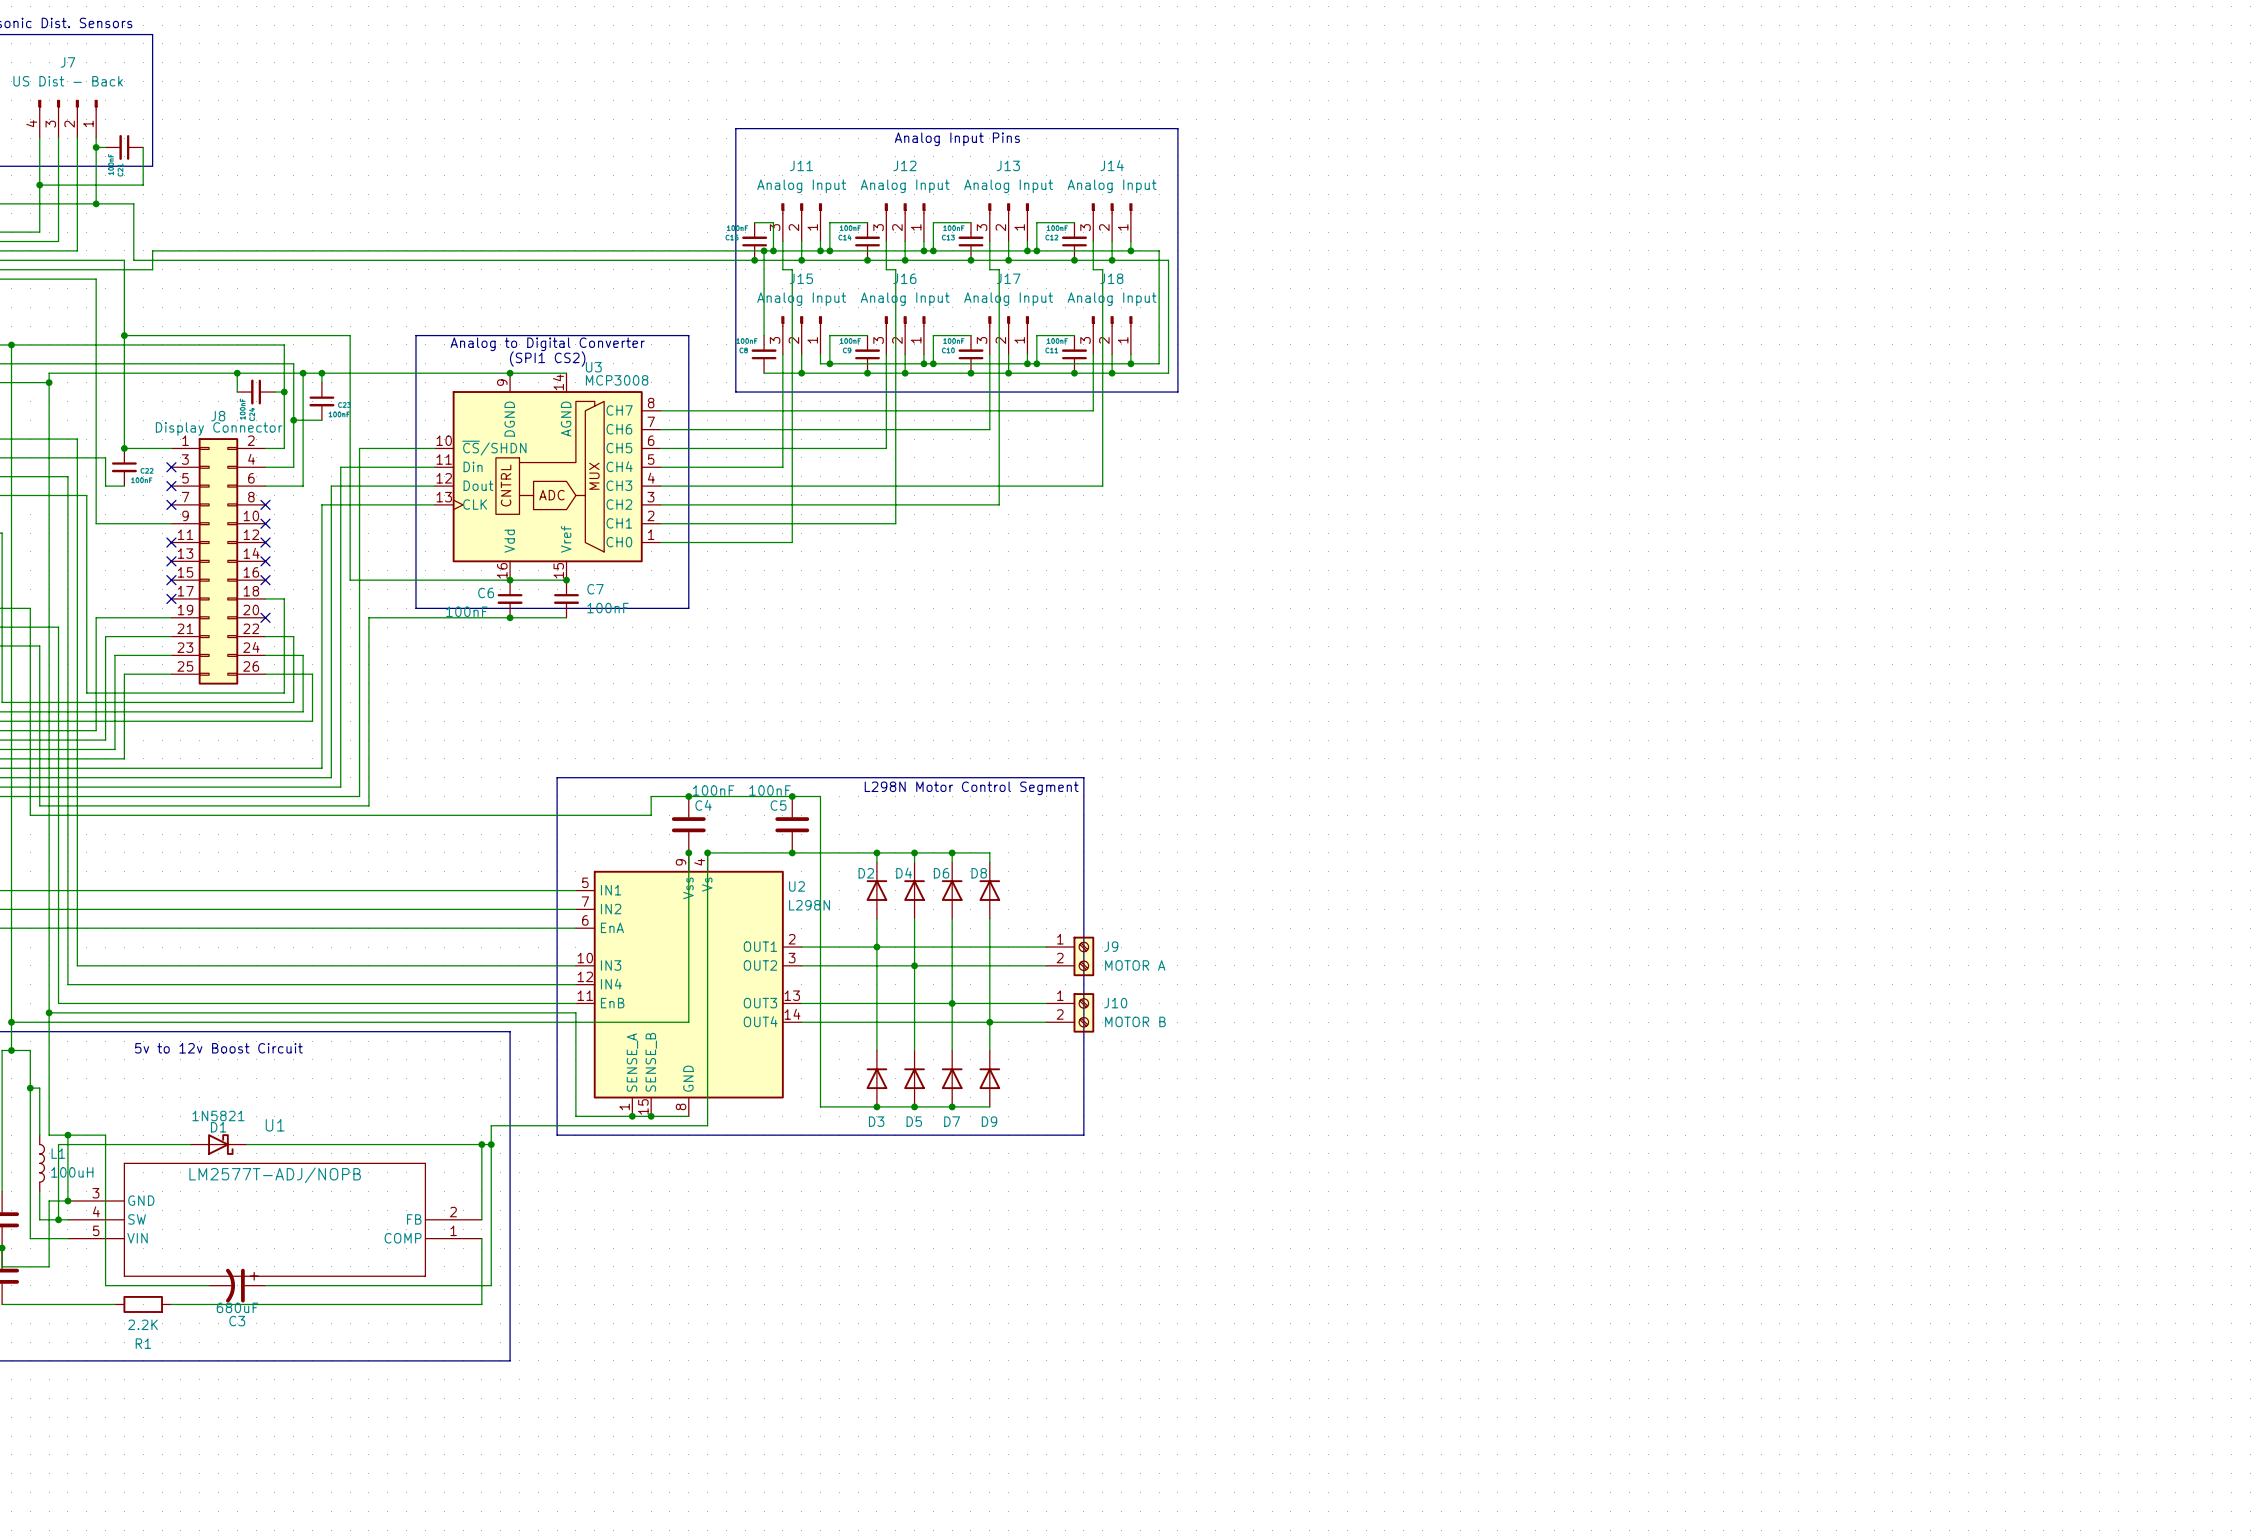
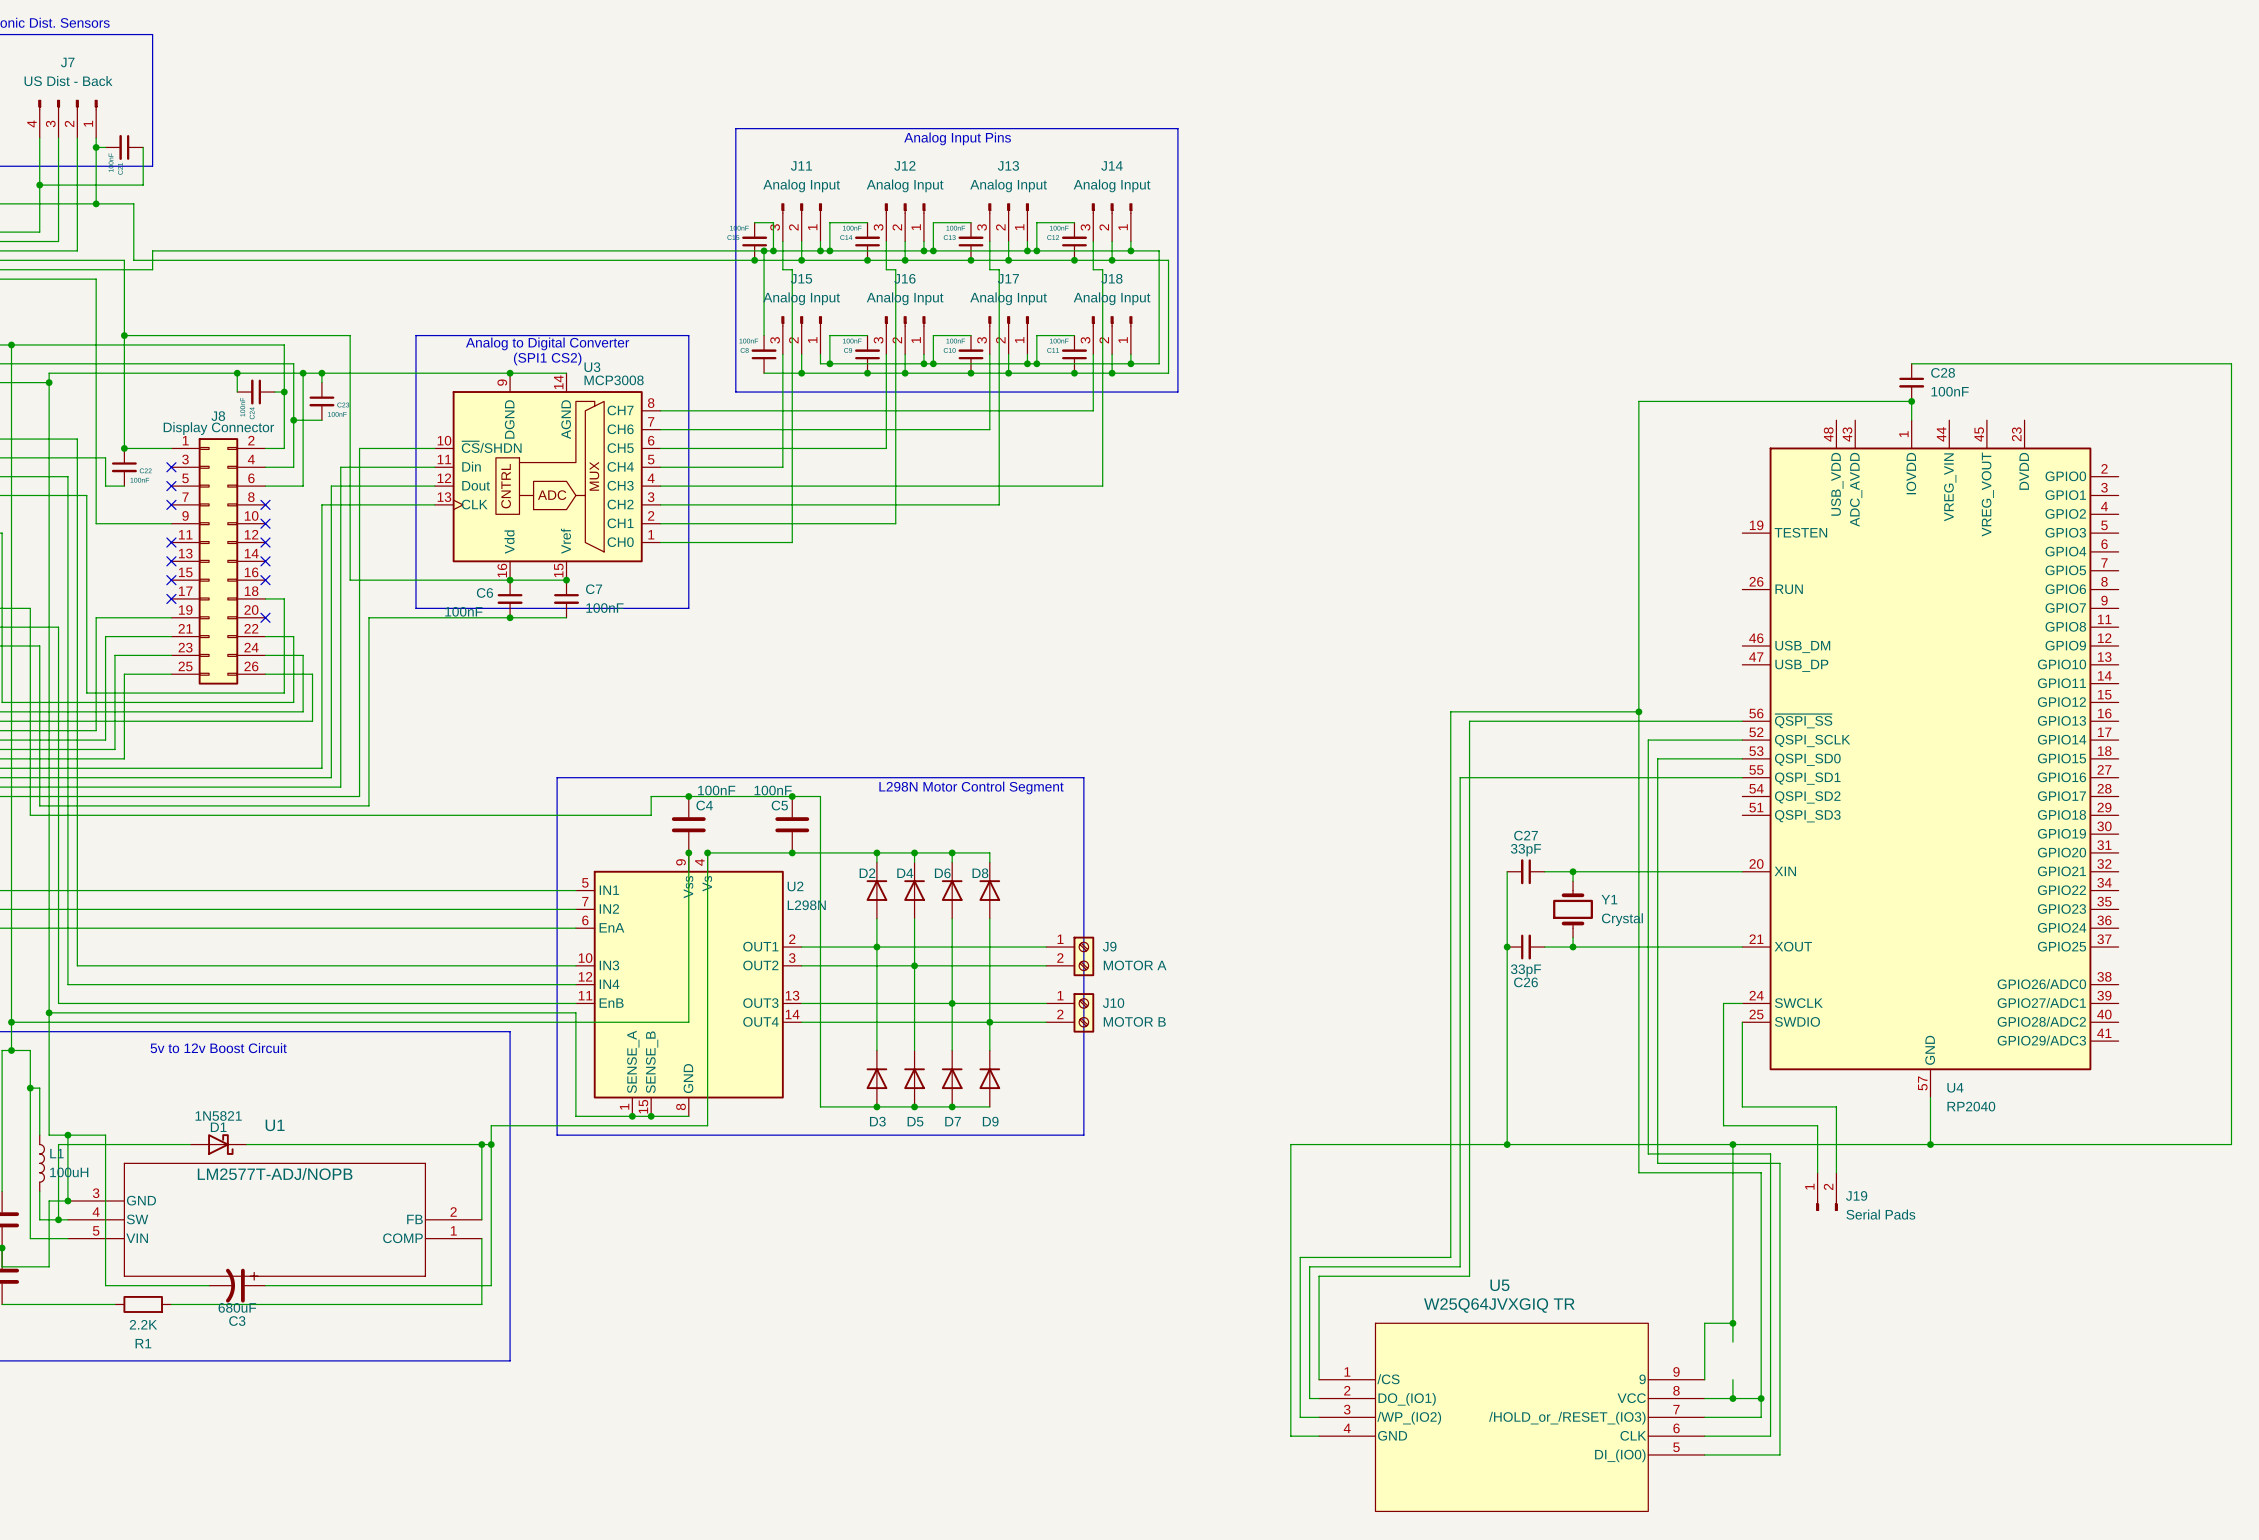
wire: none -> (1911, 363) (2231, 363) (2231, 1144) (1290, 1144) (1290, 1436) (1319, 1436)
C28: none -> 100nF (1911, 382)
junction: none -> (1911, 401)
wire: none -> (1911, 420) (1911, 401) (1638, 401) (1638, 1172) (1761, 1172) (1761, 1417) (1704, 1417)
wire: none -> (1638, 711) (1450, 711) (1450, 1257) (1300, 1257) (1300, 1417) (1319, 1417)
junction: none -> (1638, 711)
wire: none -> (1742, 721) (1469, 721) (1469, 1276) (1319, 1276) (1319, 1379)
wire: none -> (1742, 740) (1648, 740) (1648, 1153) (1770, 1153) (1770, 1436) (1704, 1436)
wire: none -> (1742, 758) (1657, 758) (1657, 1163) (1779, 1163) (1779, 1454) (1704, 1454)
U4: none -> RP2040 (1930, 758)
wire: none -> (1742, 777) (1460, 777) (1460, 1266) (1309, 1266) (1309, 1398) (1319, 1398)
wire: none -> (1507, 871) (1507, 1144)
C27: none -> 33pF (1525, 871)
wire: none -> (1544, 871) (1742, 871)
wire: none -> (1573, 871) (1573, 881)
junction: none -> (1573, 871)
Y1: none -> Crystal (1573, 909)
wire: none -> (1573, 937) (1573, 947)
junction: none -> (1507, 947)
C26: none -> 33pF (1525, 947)
wire: none -> (1544, 947) (1742, 947)
junction: none -> (1573, 947)
wire: none -> (1742, 1003) (1723, 1003) (1723, 1125) (1817, 1125) (1817, 1172)
wire: none -> (1742, 1022) (1742, 1106) (1836, 1106) (1836, 1172)
wire: none -> (1930, 1097) (1930, 1144)
junction: none -> (1507, 1144)
wire: none -> (1732, 1144) (1732, 1342)
junction: none -> (1732, 1144)
junction: none -> (1930, 1144)
J19: none -> Serial Pads (1827, 1191)
wire: none -> (1732, 1323) (1704, 1323) (1704, 1379)
junction: none -> (1732, 1323)
wire: none -> (1732, 1379) (1732, 1398)
wire: none -> (1704, 1398) (1761, 1398)
junction: none -> (1732, 1398)
junction: none -> (1761, 1398)
U5: none -> W25Q64JVXGIQ TR (1511, 1417)

